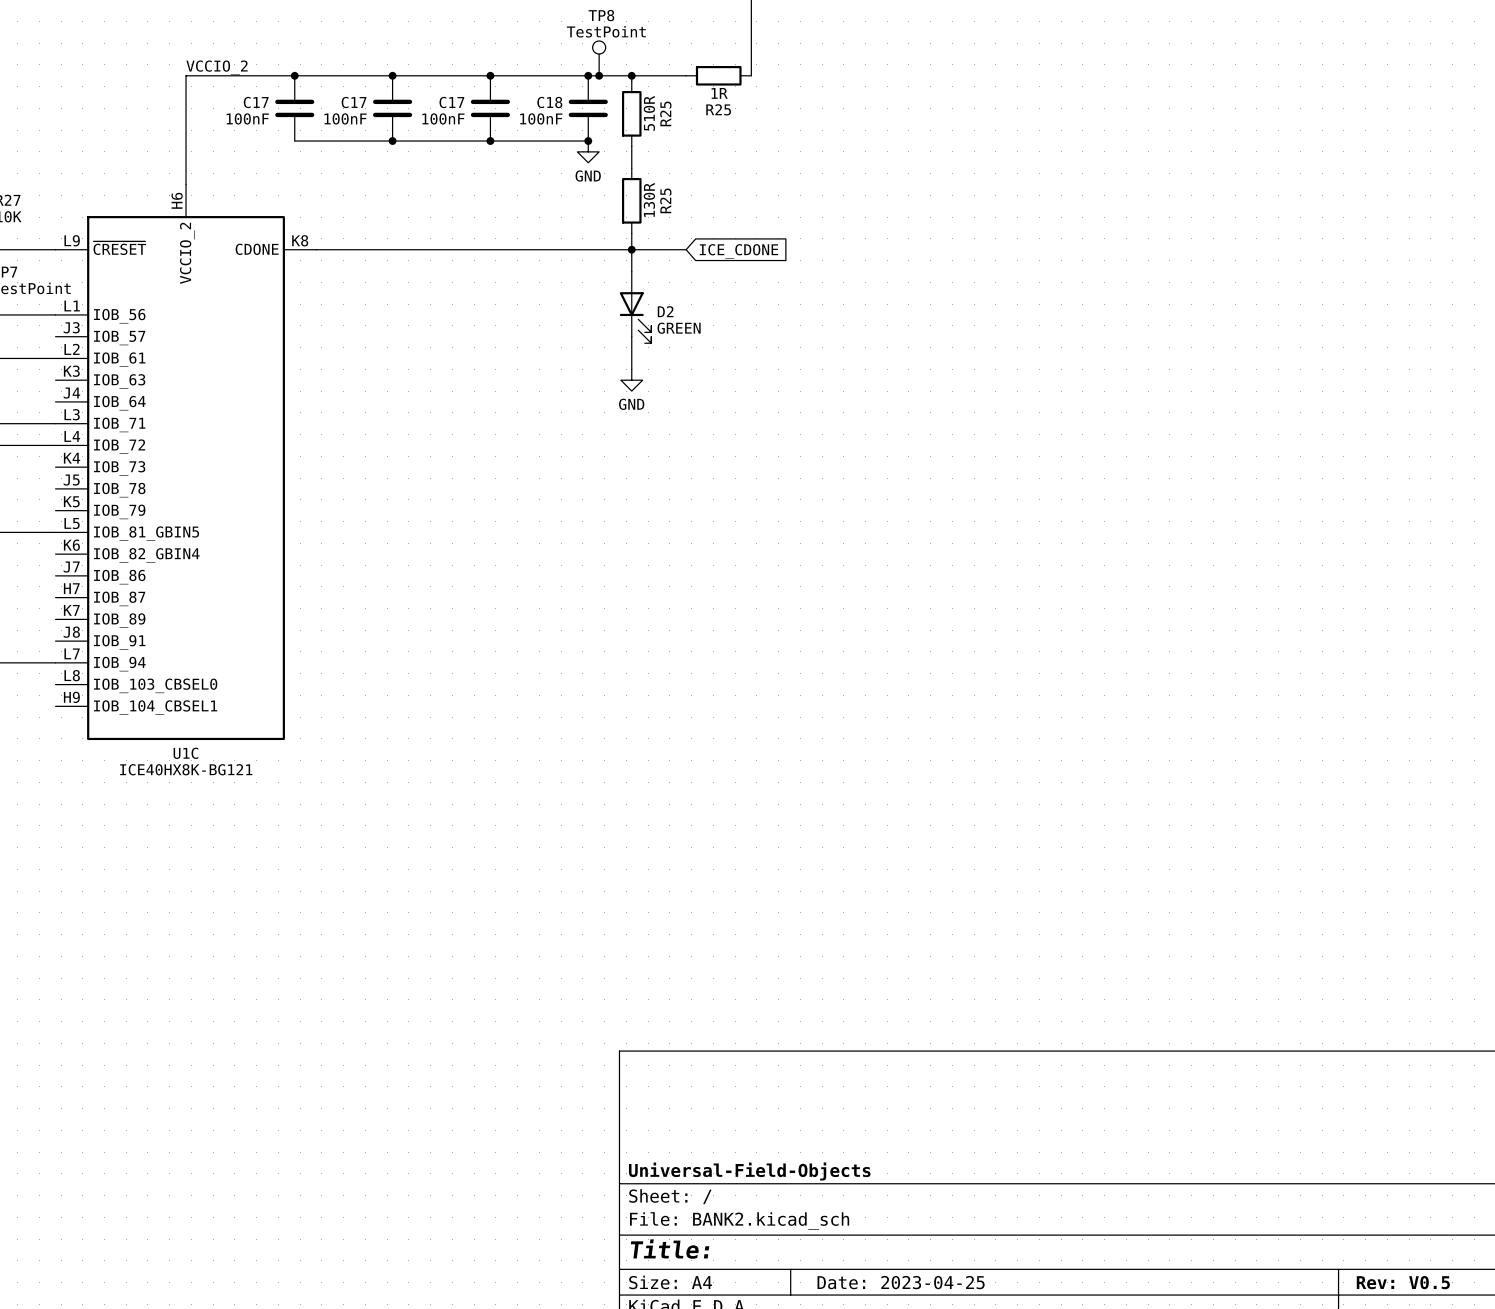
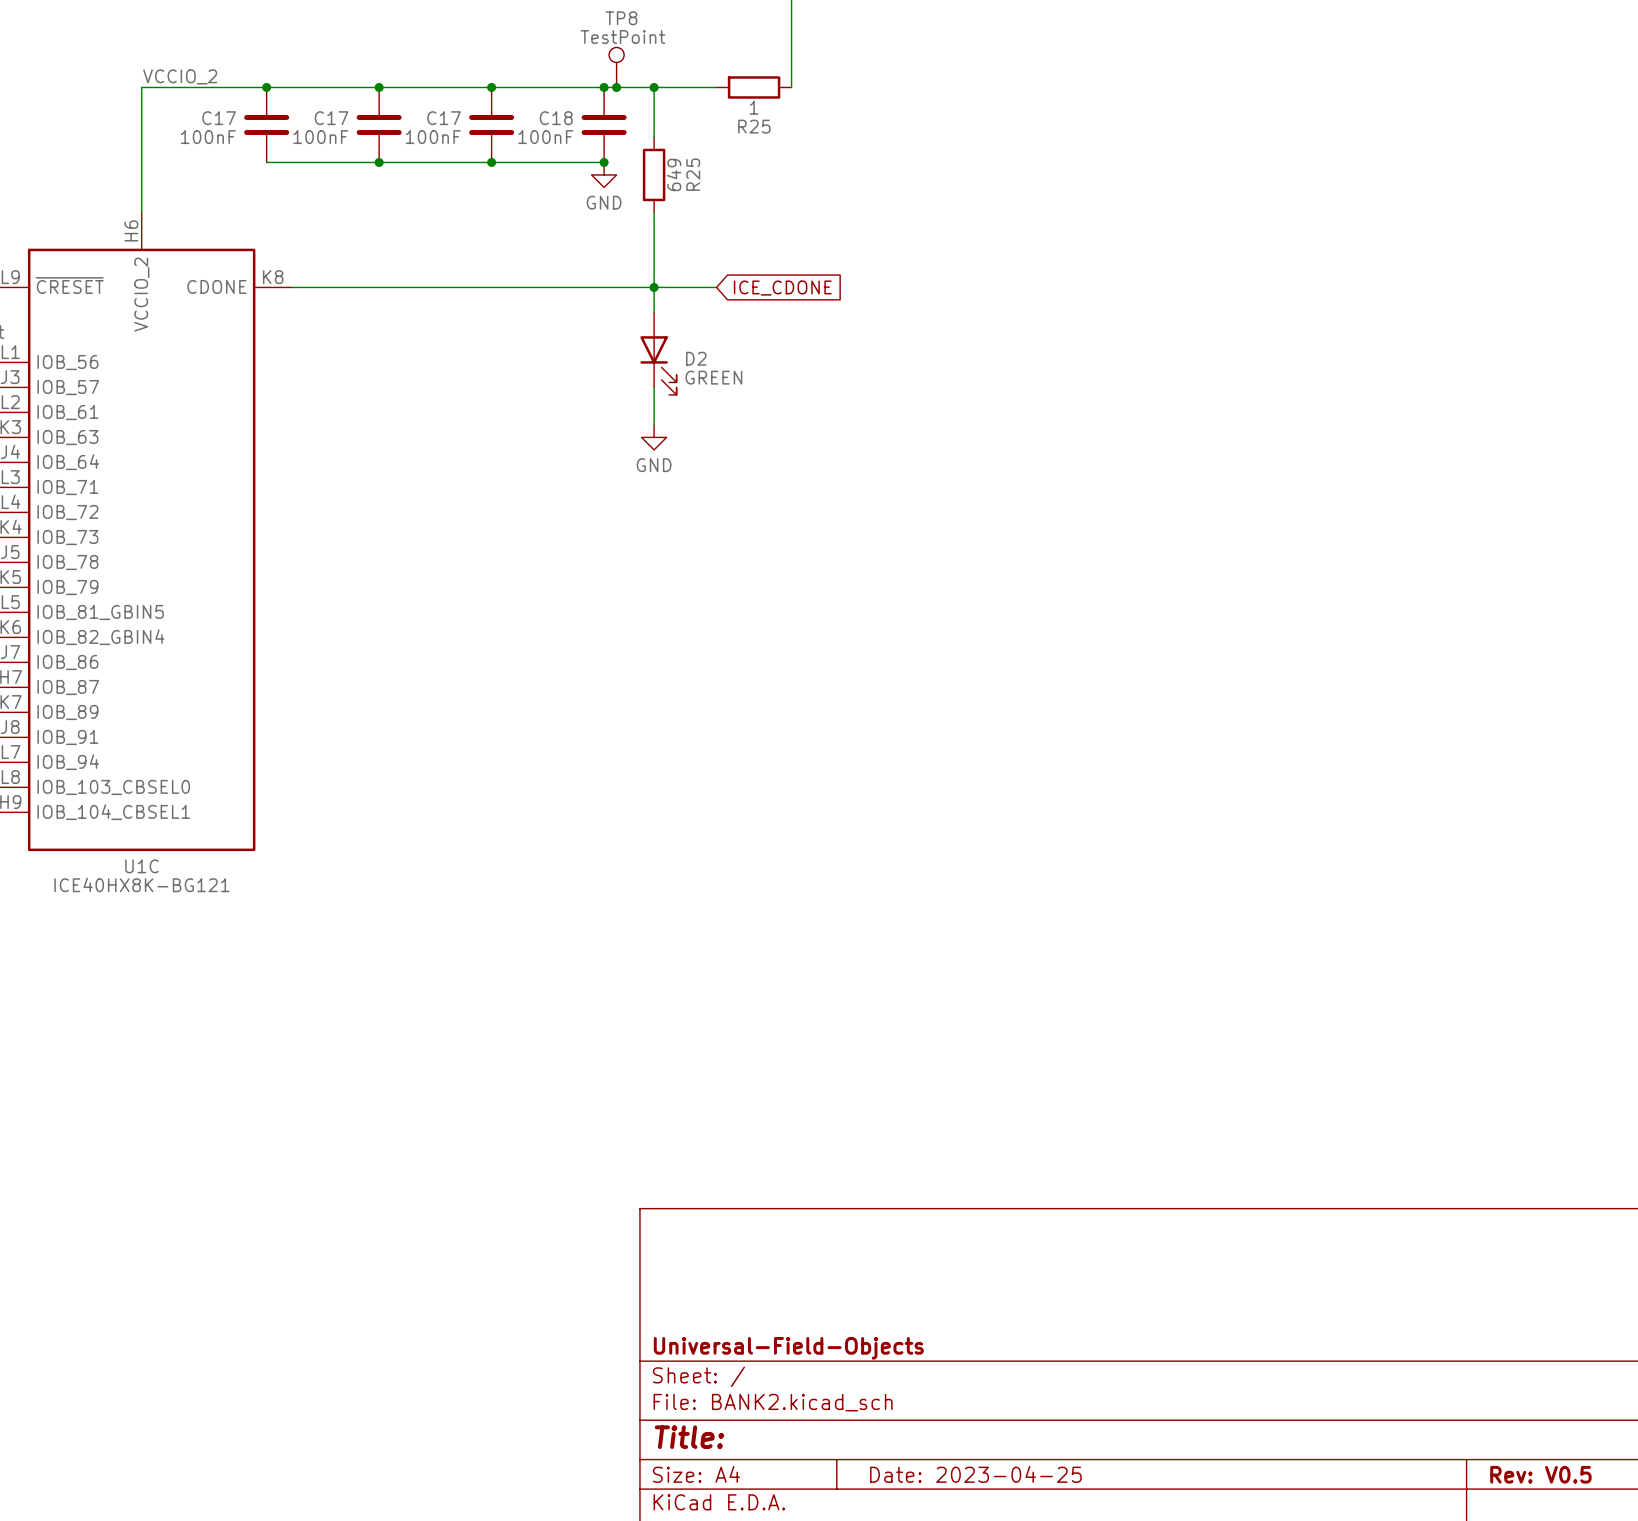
wire: none -> (654, 93) (654, 137)
R25 value: 1R (719, 93) -> 1 (754, 107)
R25: 510R (631, 113) -> none
wire: (631, 146) (631, 168) -> none
R25: none -> 649 (654, 174)
wire: none -> (654, 212) (654, 268)
R25: 130R (631, 200) -> none

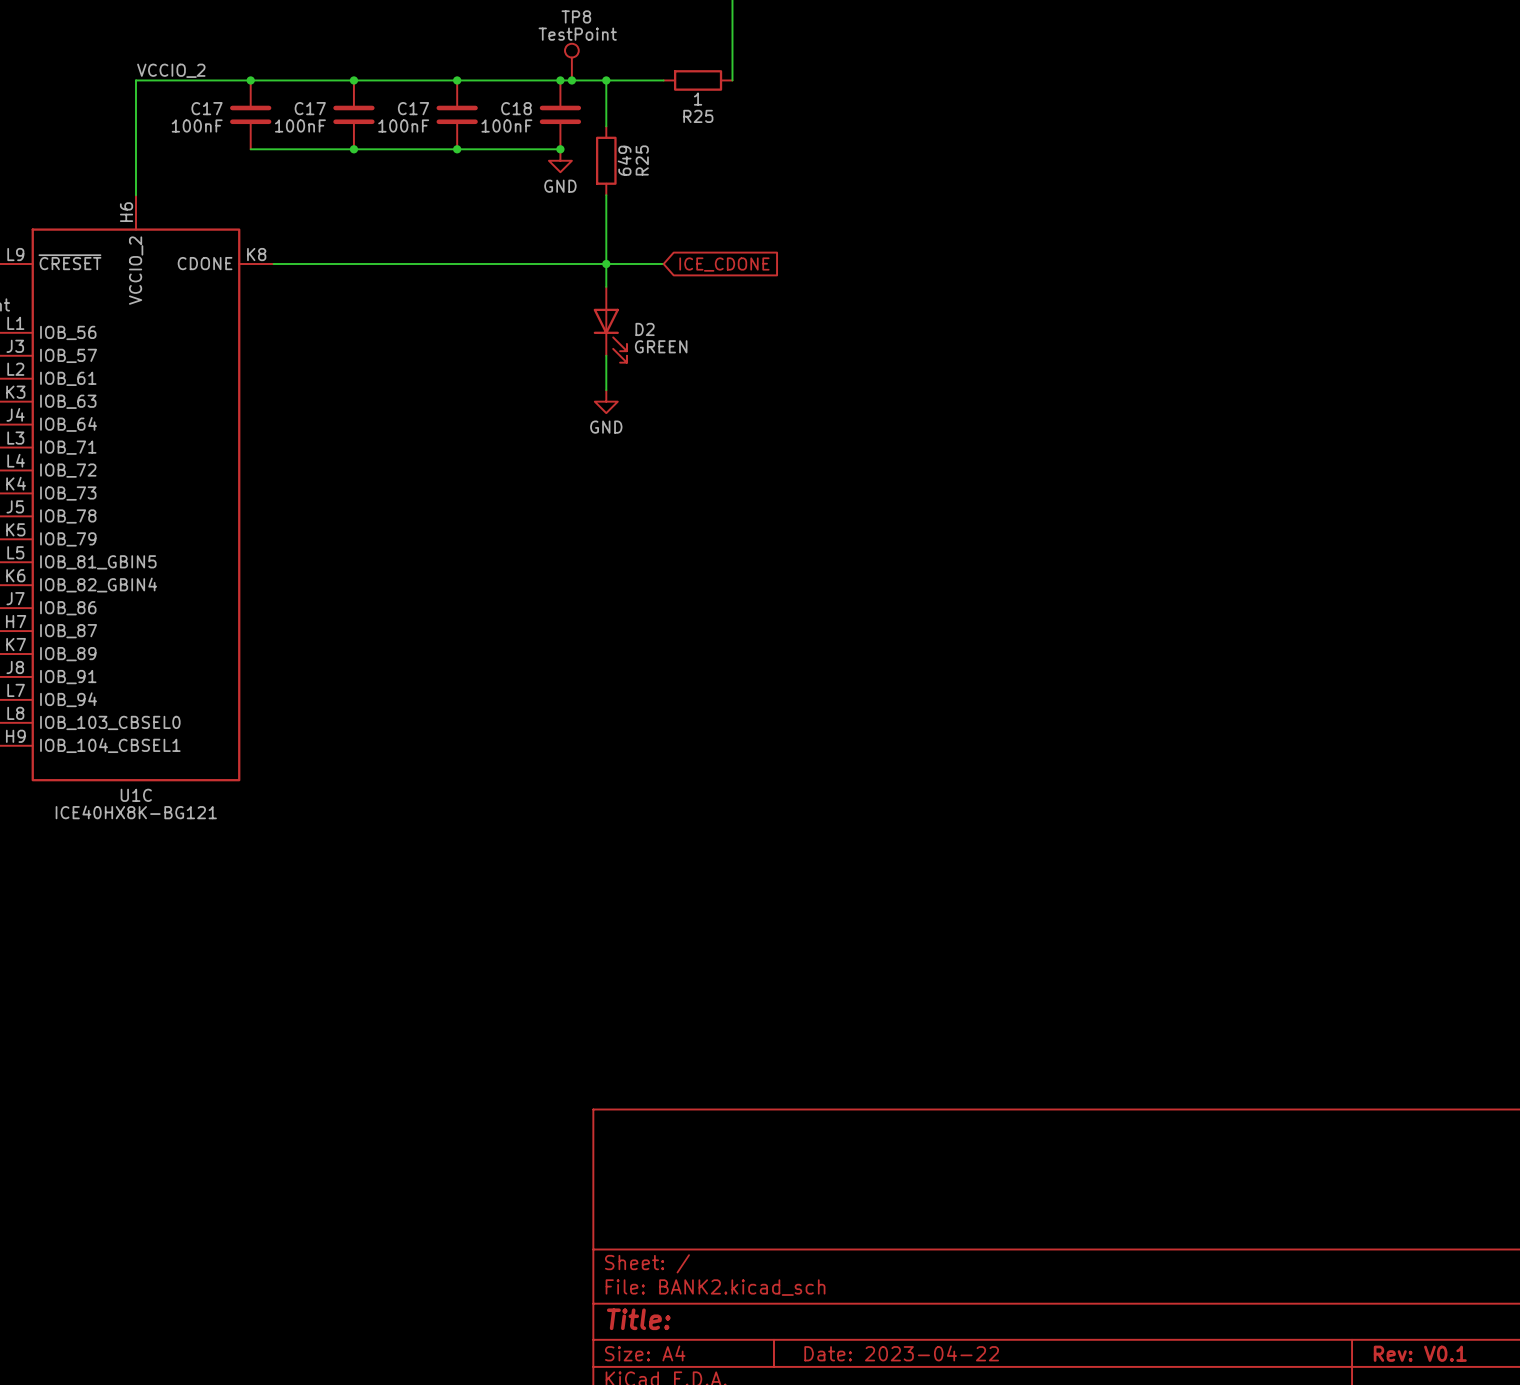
title block: Universal-Field-Objects (788, 1348) -> none
title block: Date: 2023-04-25 (975, 1474) -> Date: 2023-04-22 (901, 1353)
title block: Rev: V0.5 (1540, 1474) -> Rev: V0.1 (1420, 1353)

